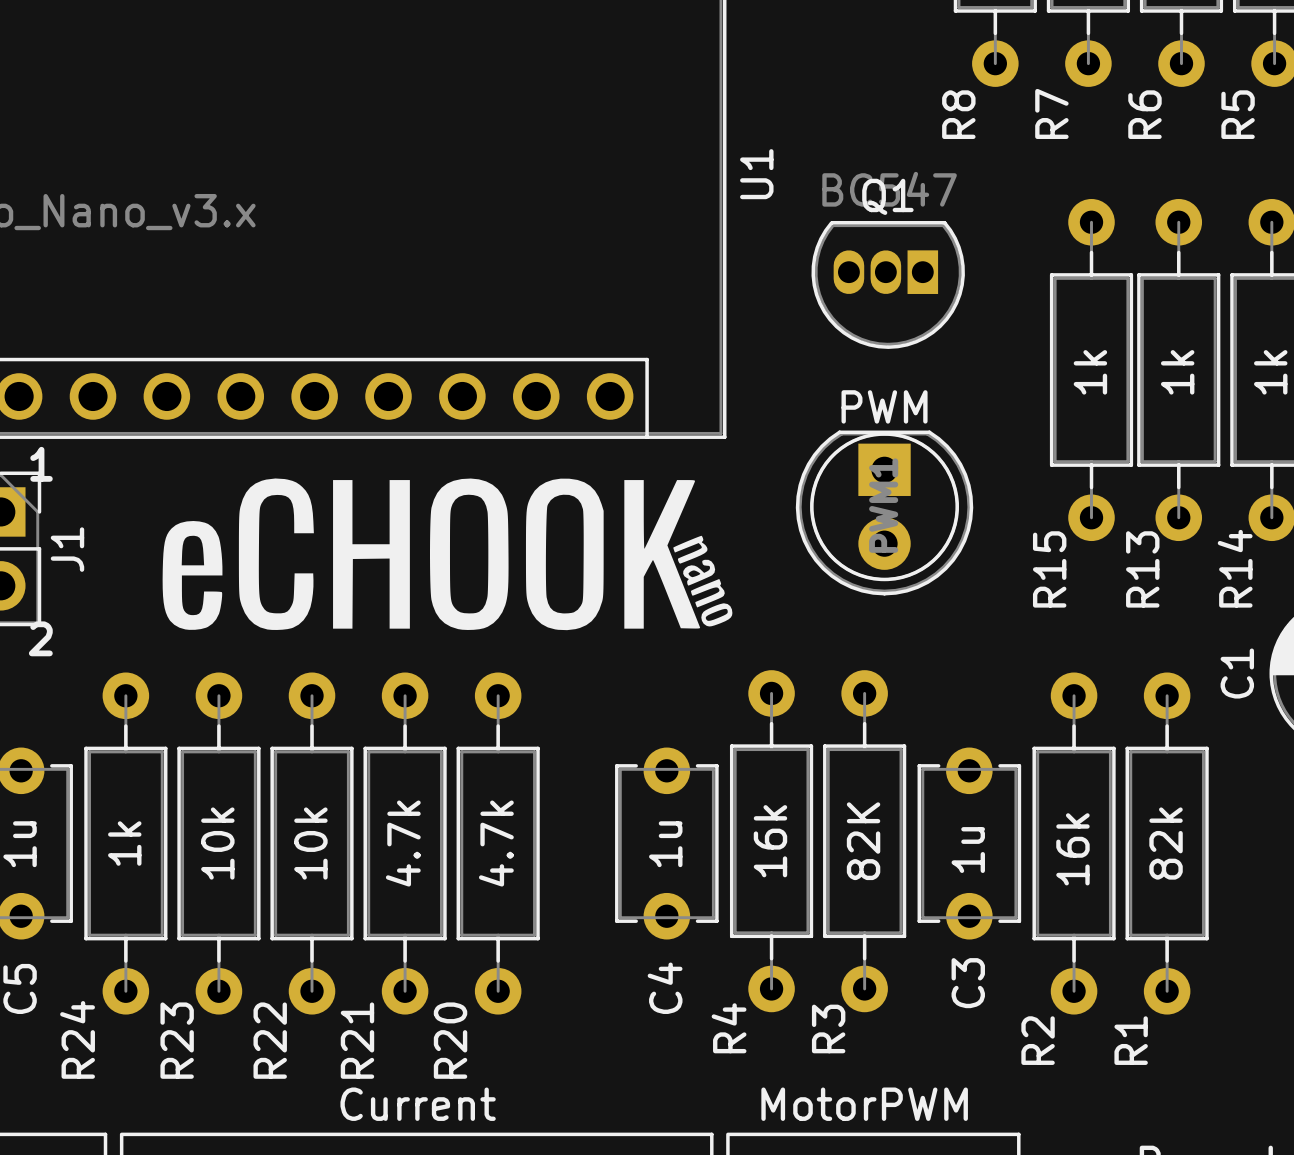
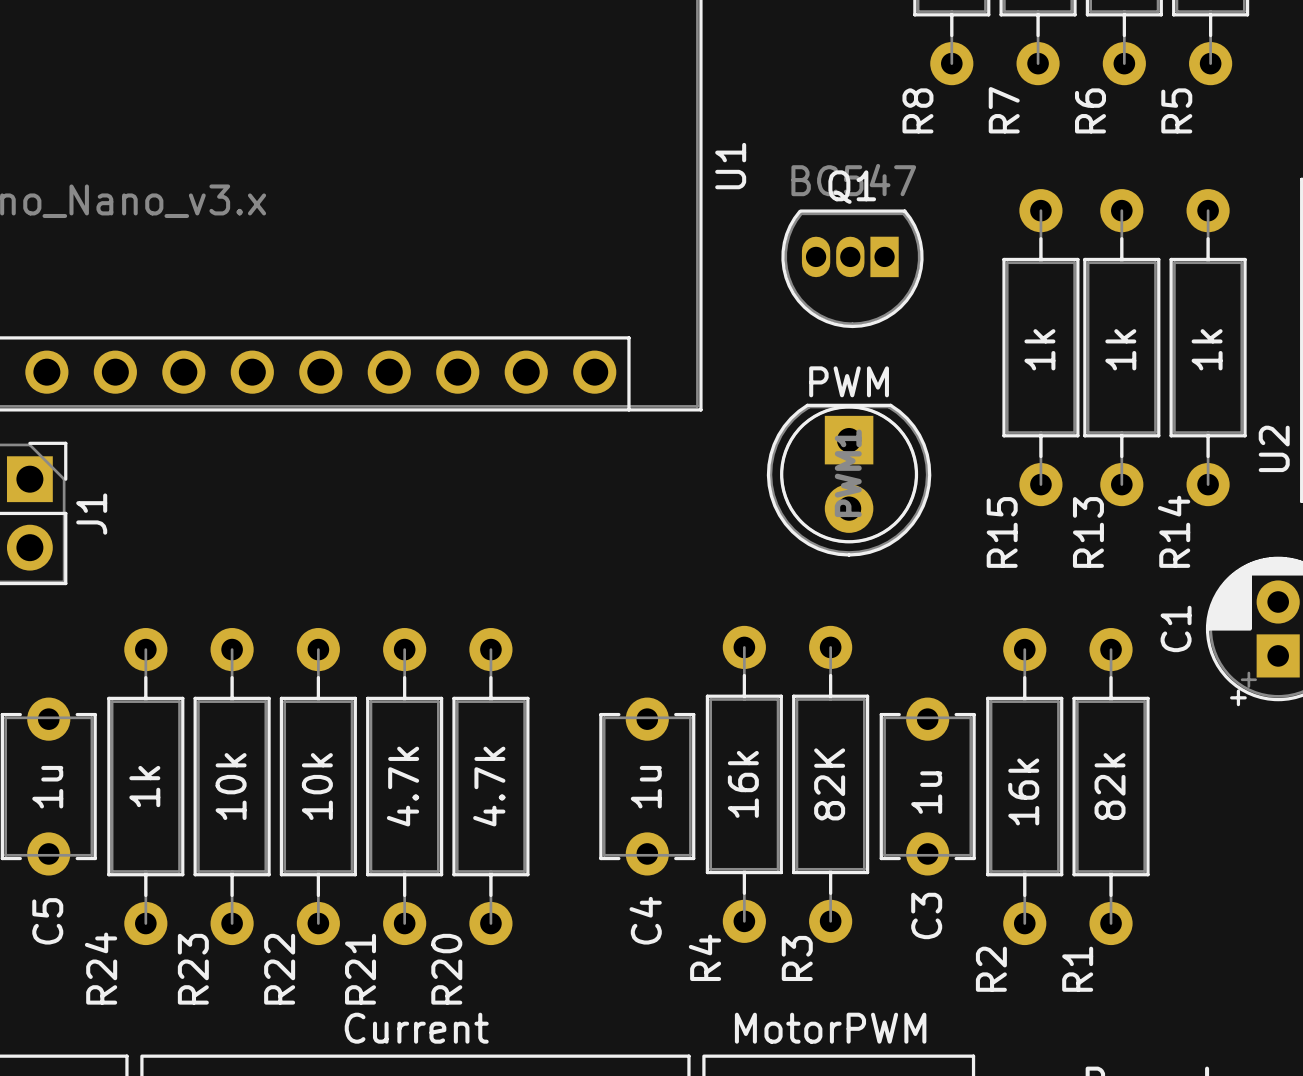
text: 1 (41, 464) -> none
drawing: [162, 478, 733, 631] -> none
text: 2 (40, 638) -> none

